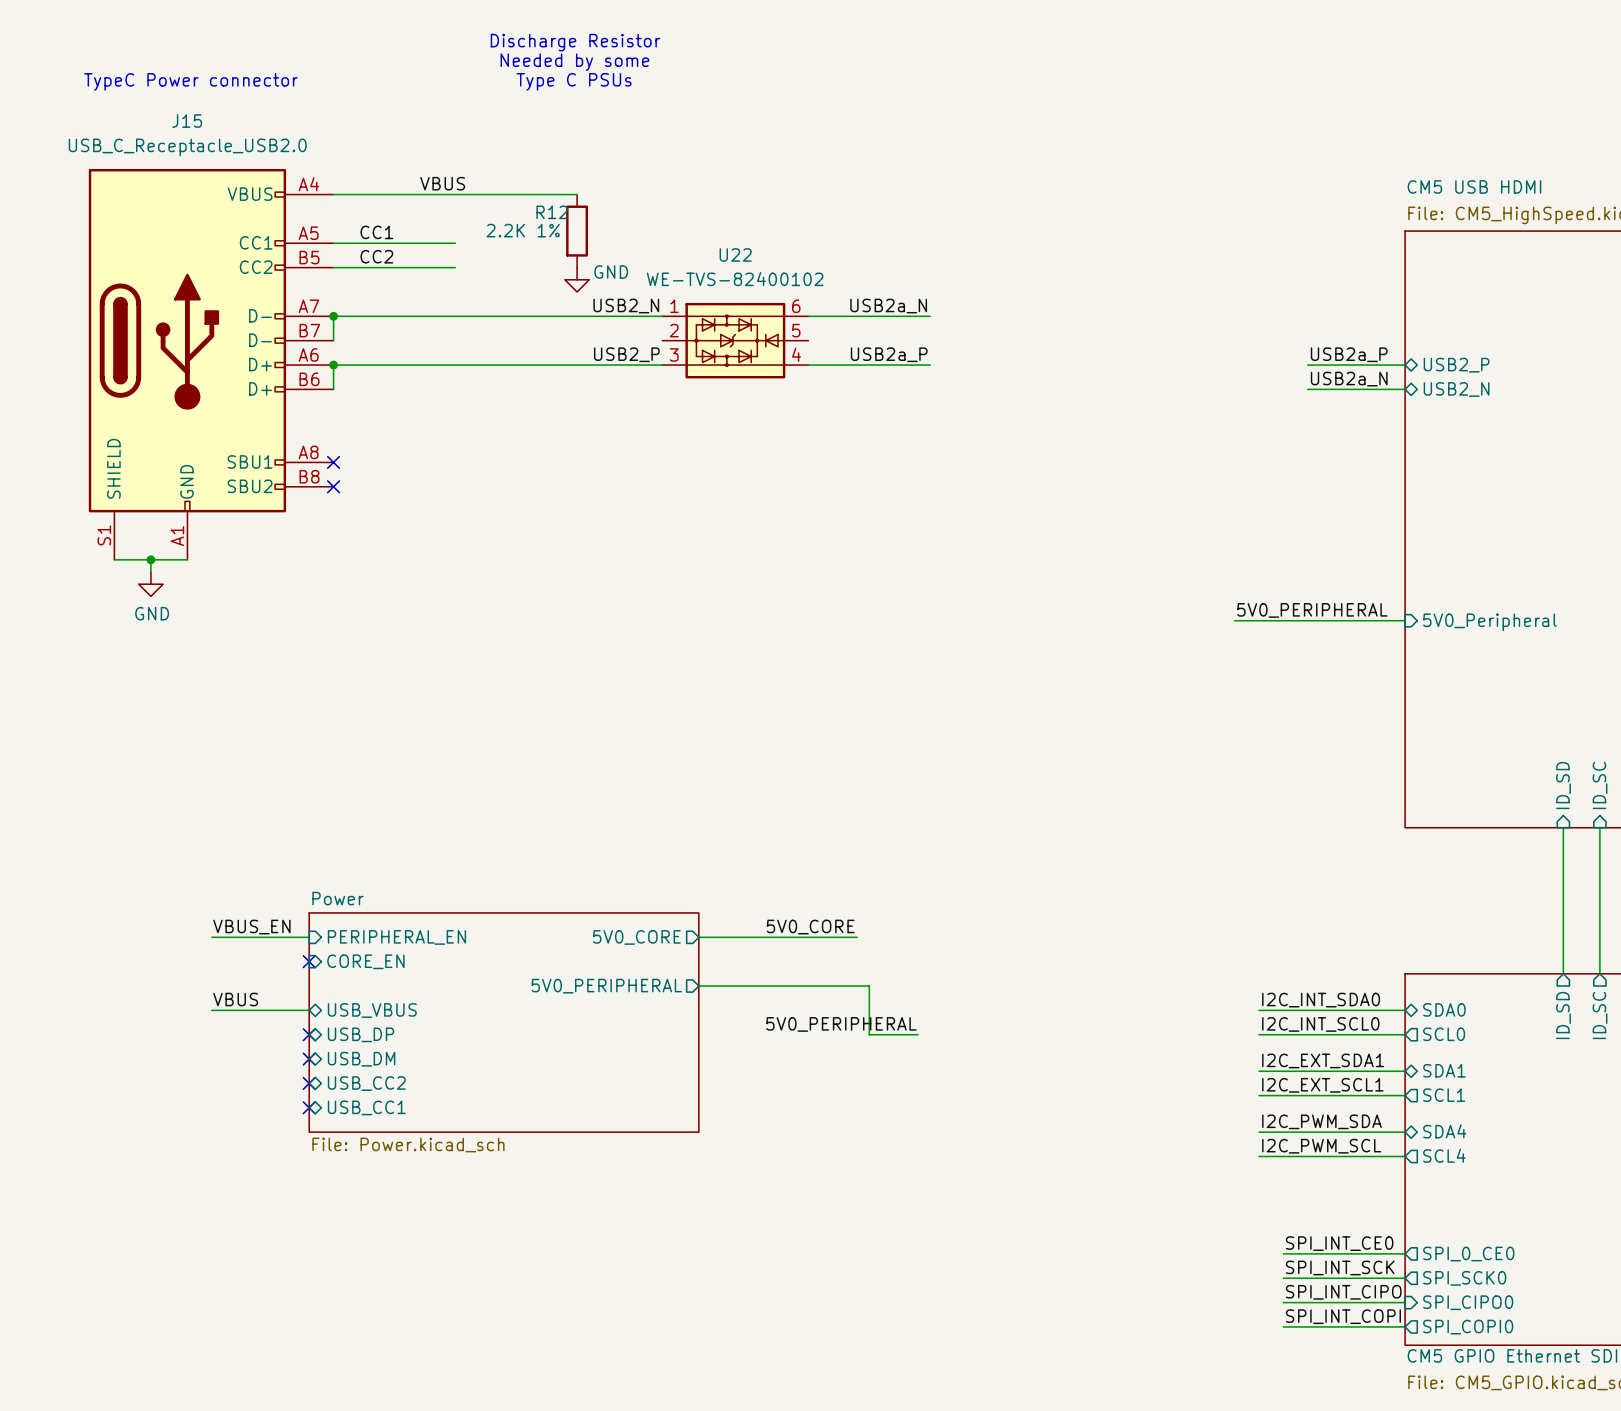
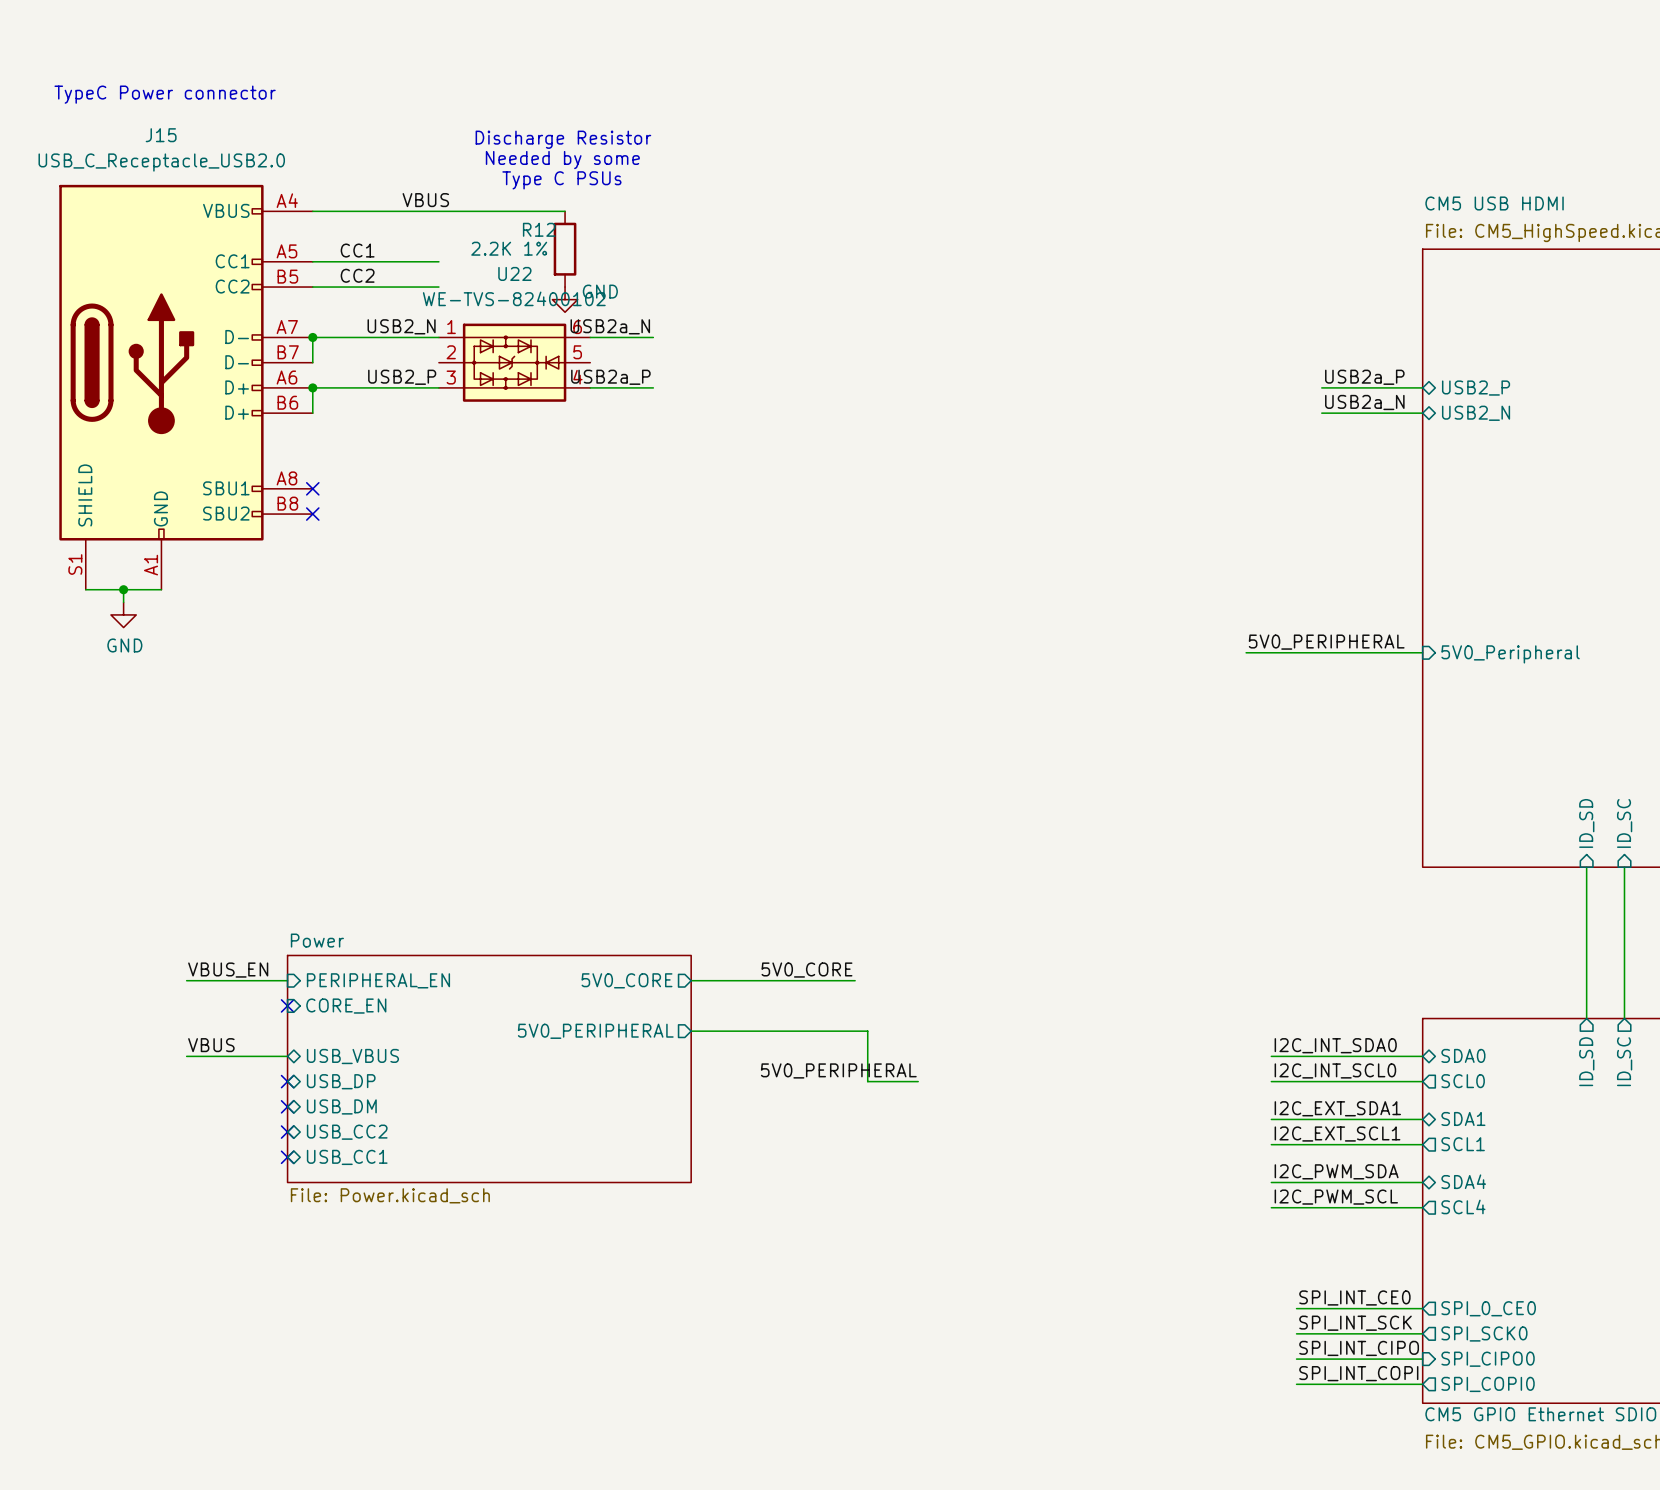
text position: Discharge Resistor (575, 42) -> Discharge Resistor (563, 139)
text position: Needed by some (574, 62) -> Needed by some (562, 160)
text position: Type C PSUs (574, 81) -> Type C PSUs (561, 180)
label: none -> USB2_N (401, 326)
label: USB2_N (626, 306) -> USB2a_N (610, 326)
label: USB2a_N (888, 306) -> none
wire: (808, 316) (930, 316) -> none
U22 position: (735, 340) -> (514, 362)
label: none -> USB2_P (402, 377)
label: USB2_P (626, 354) -> USB2a_P (610, 377)
label: USB2a_P (889, 354) -> none
wire: (808, 365) (930, 365) -> none

